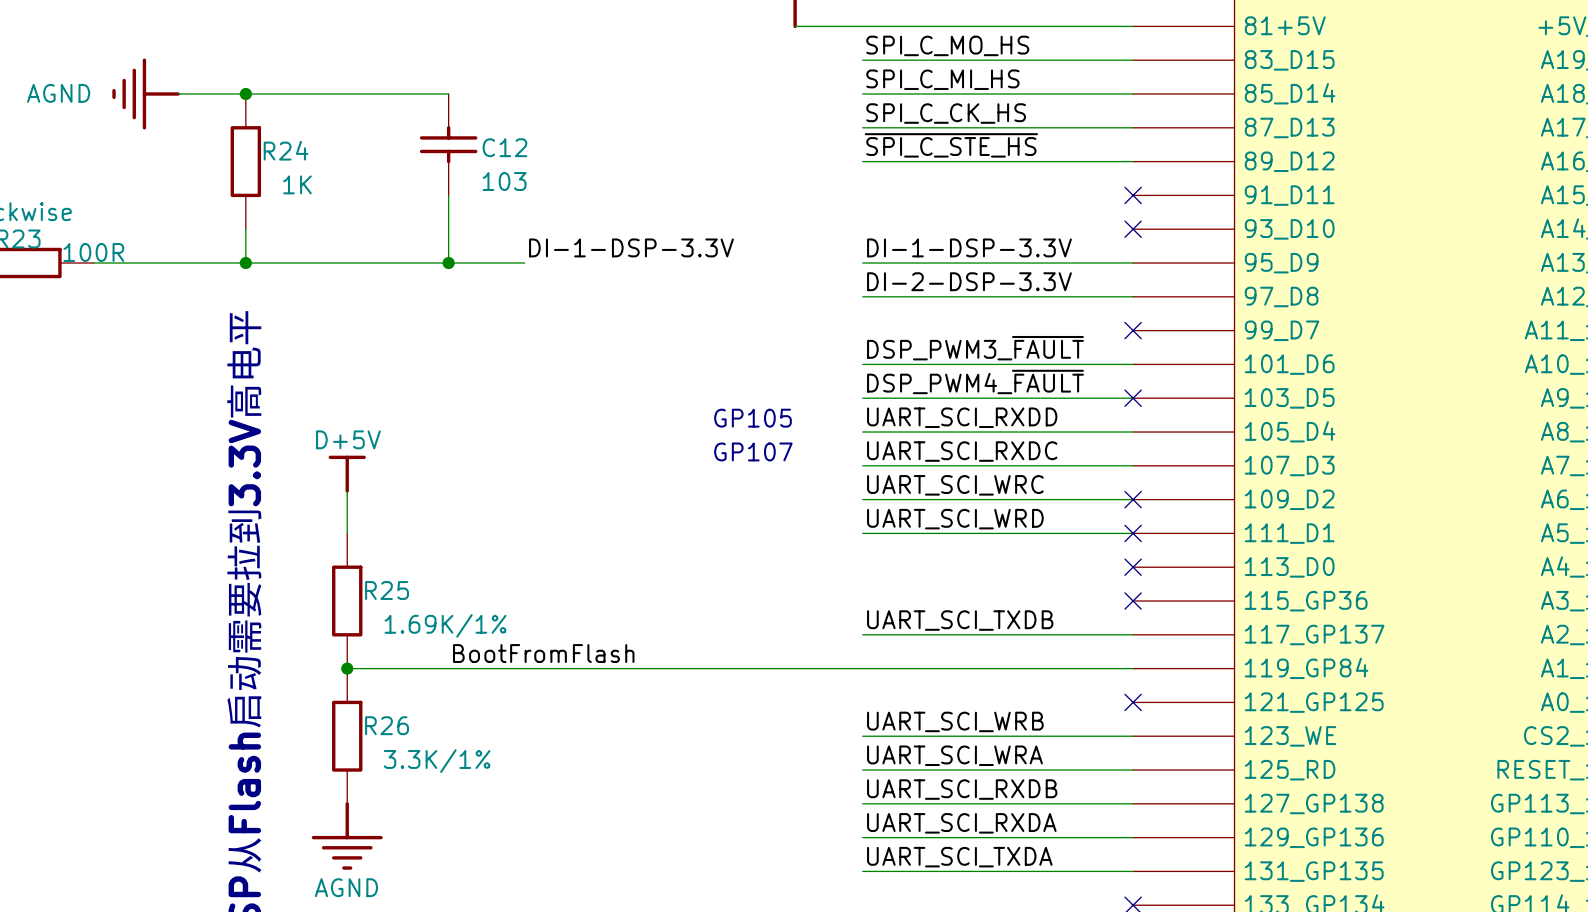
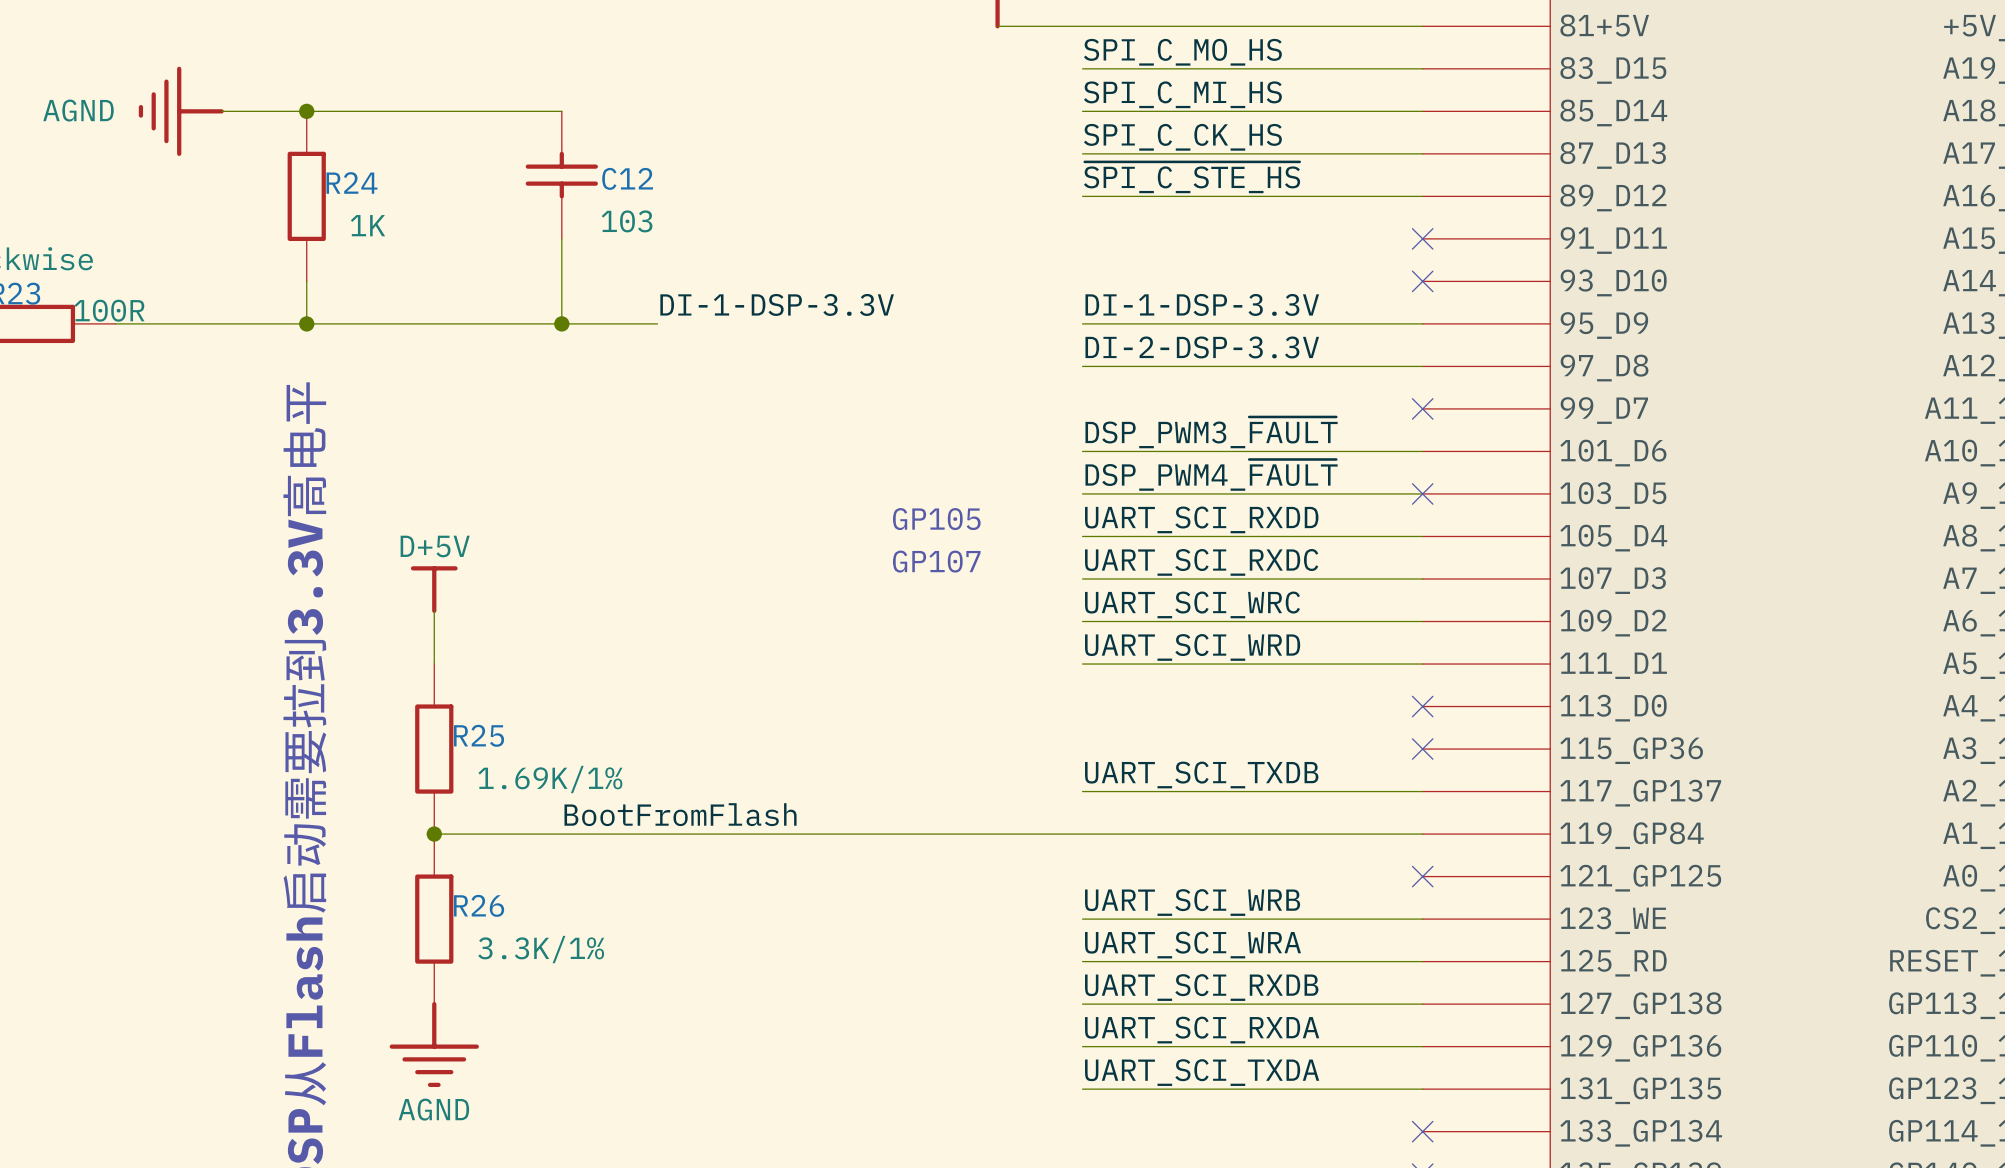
no-connect mark: (1133, 499) -> none
no-connect mark: (1133, 533) -> none

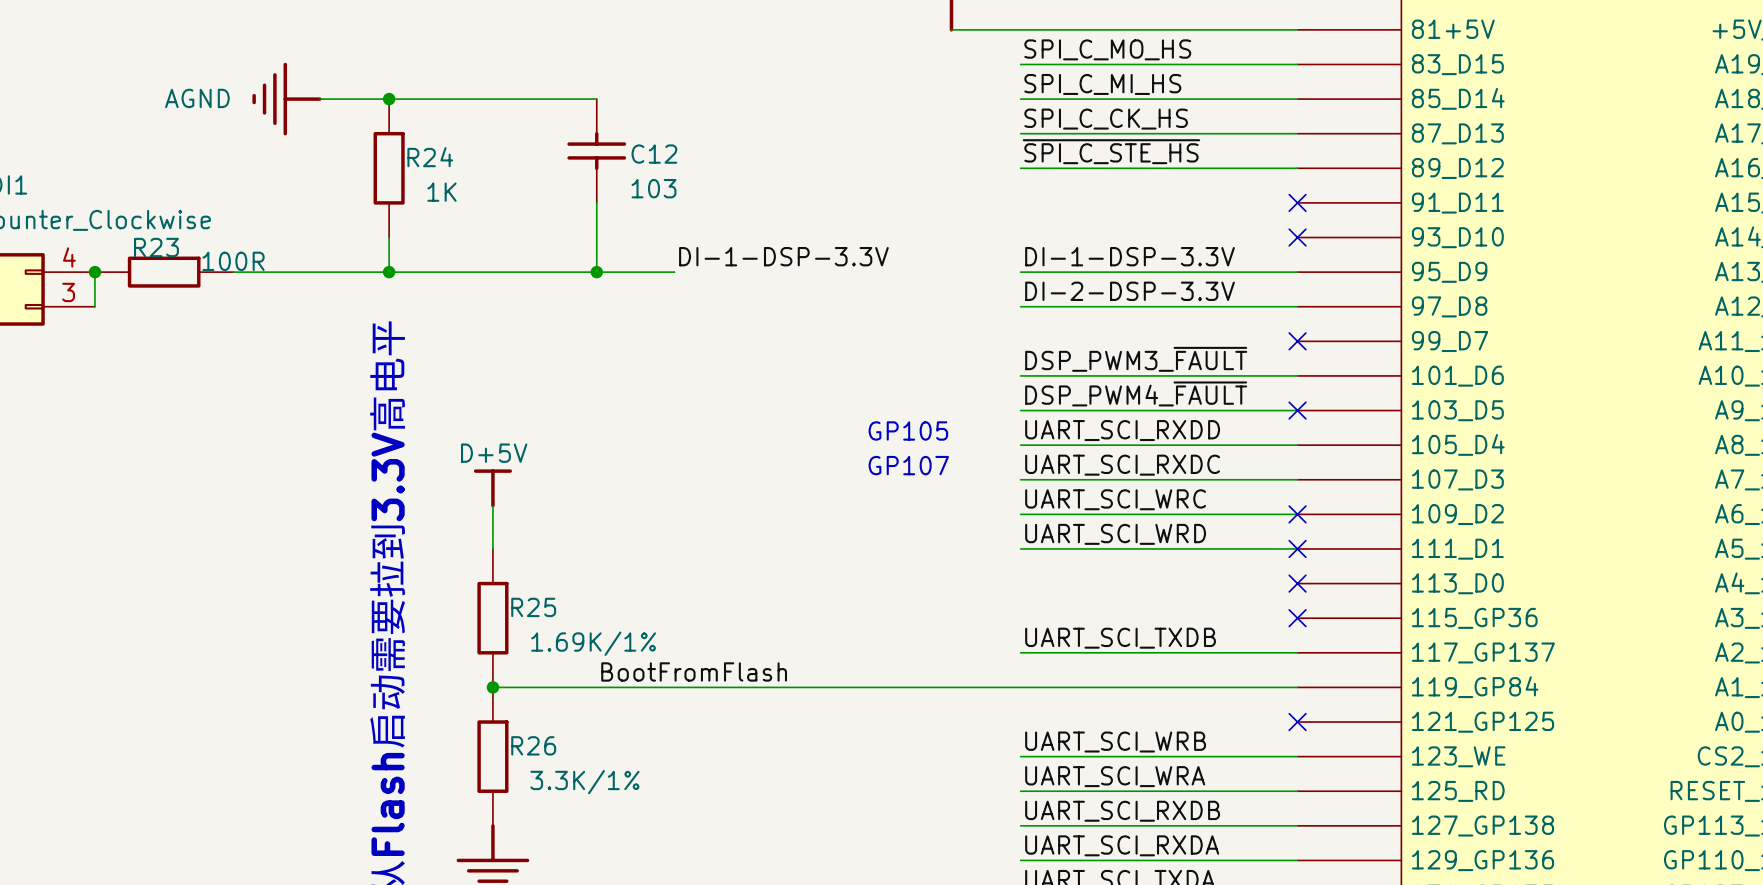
no-connect mark: none -> (1297, 514)
no-connect mark: none -> (1297, 548)

